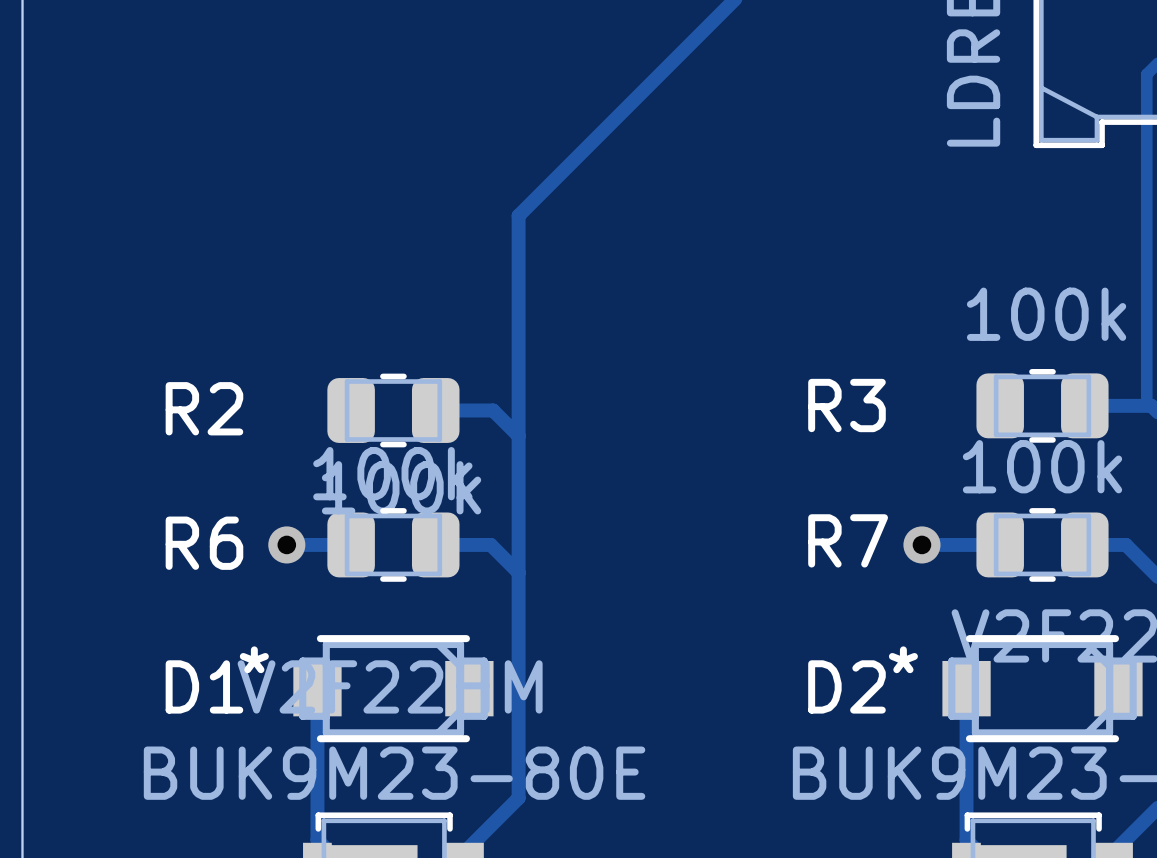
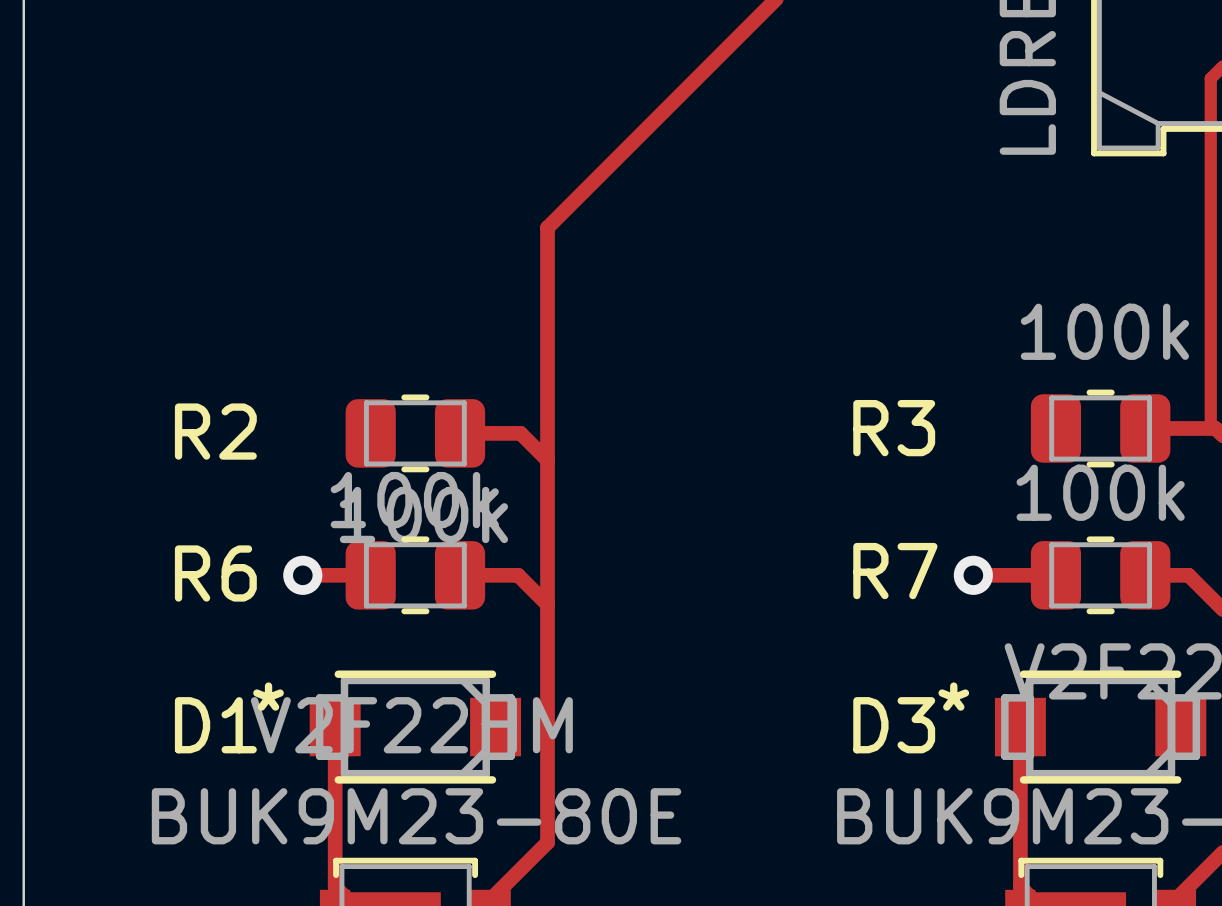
D2 name: D2 (846, 686) -> D3 (894, 725)

